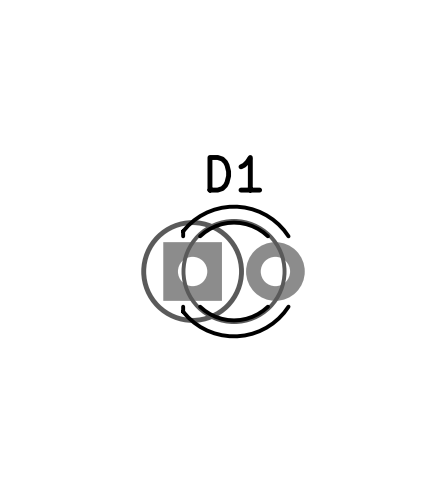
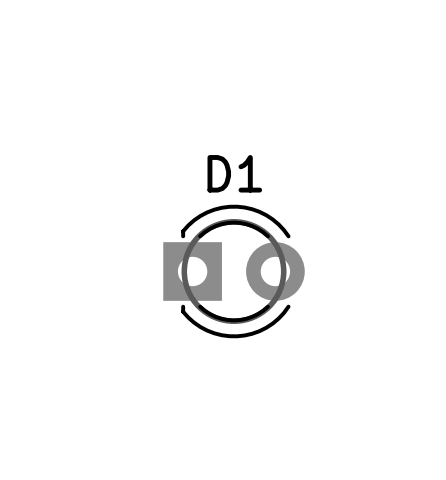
D1 footprint: [141, 204, 305, 339] -> [163, 204, 305, 339]

